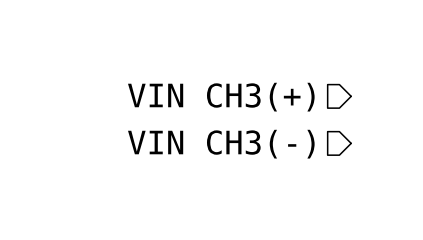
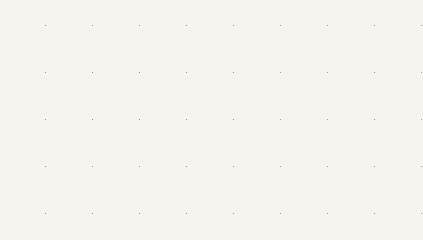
hierarchical label: VIN CH3(+) (221, 97) -> none
hierarchical label: VIN CH3(-) (221, 144) -> none

